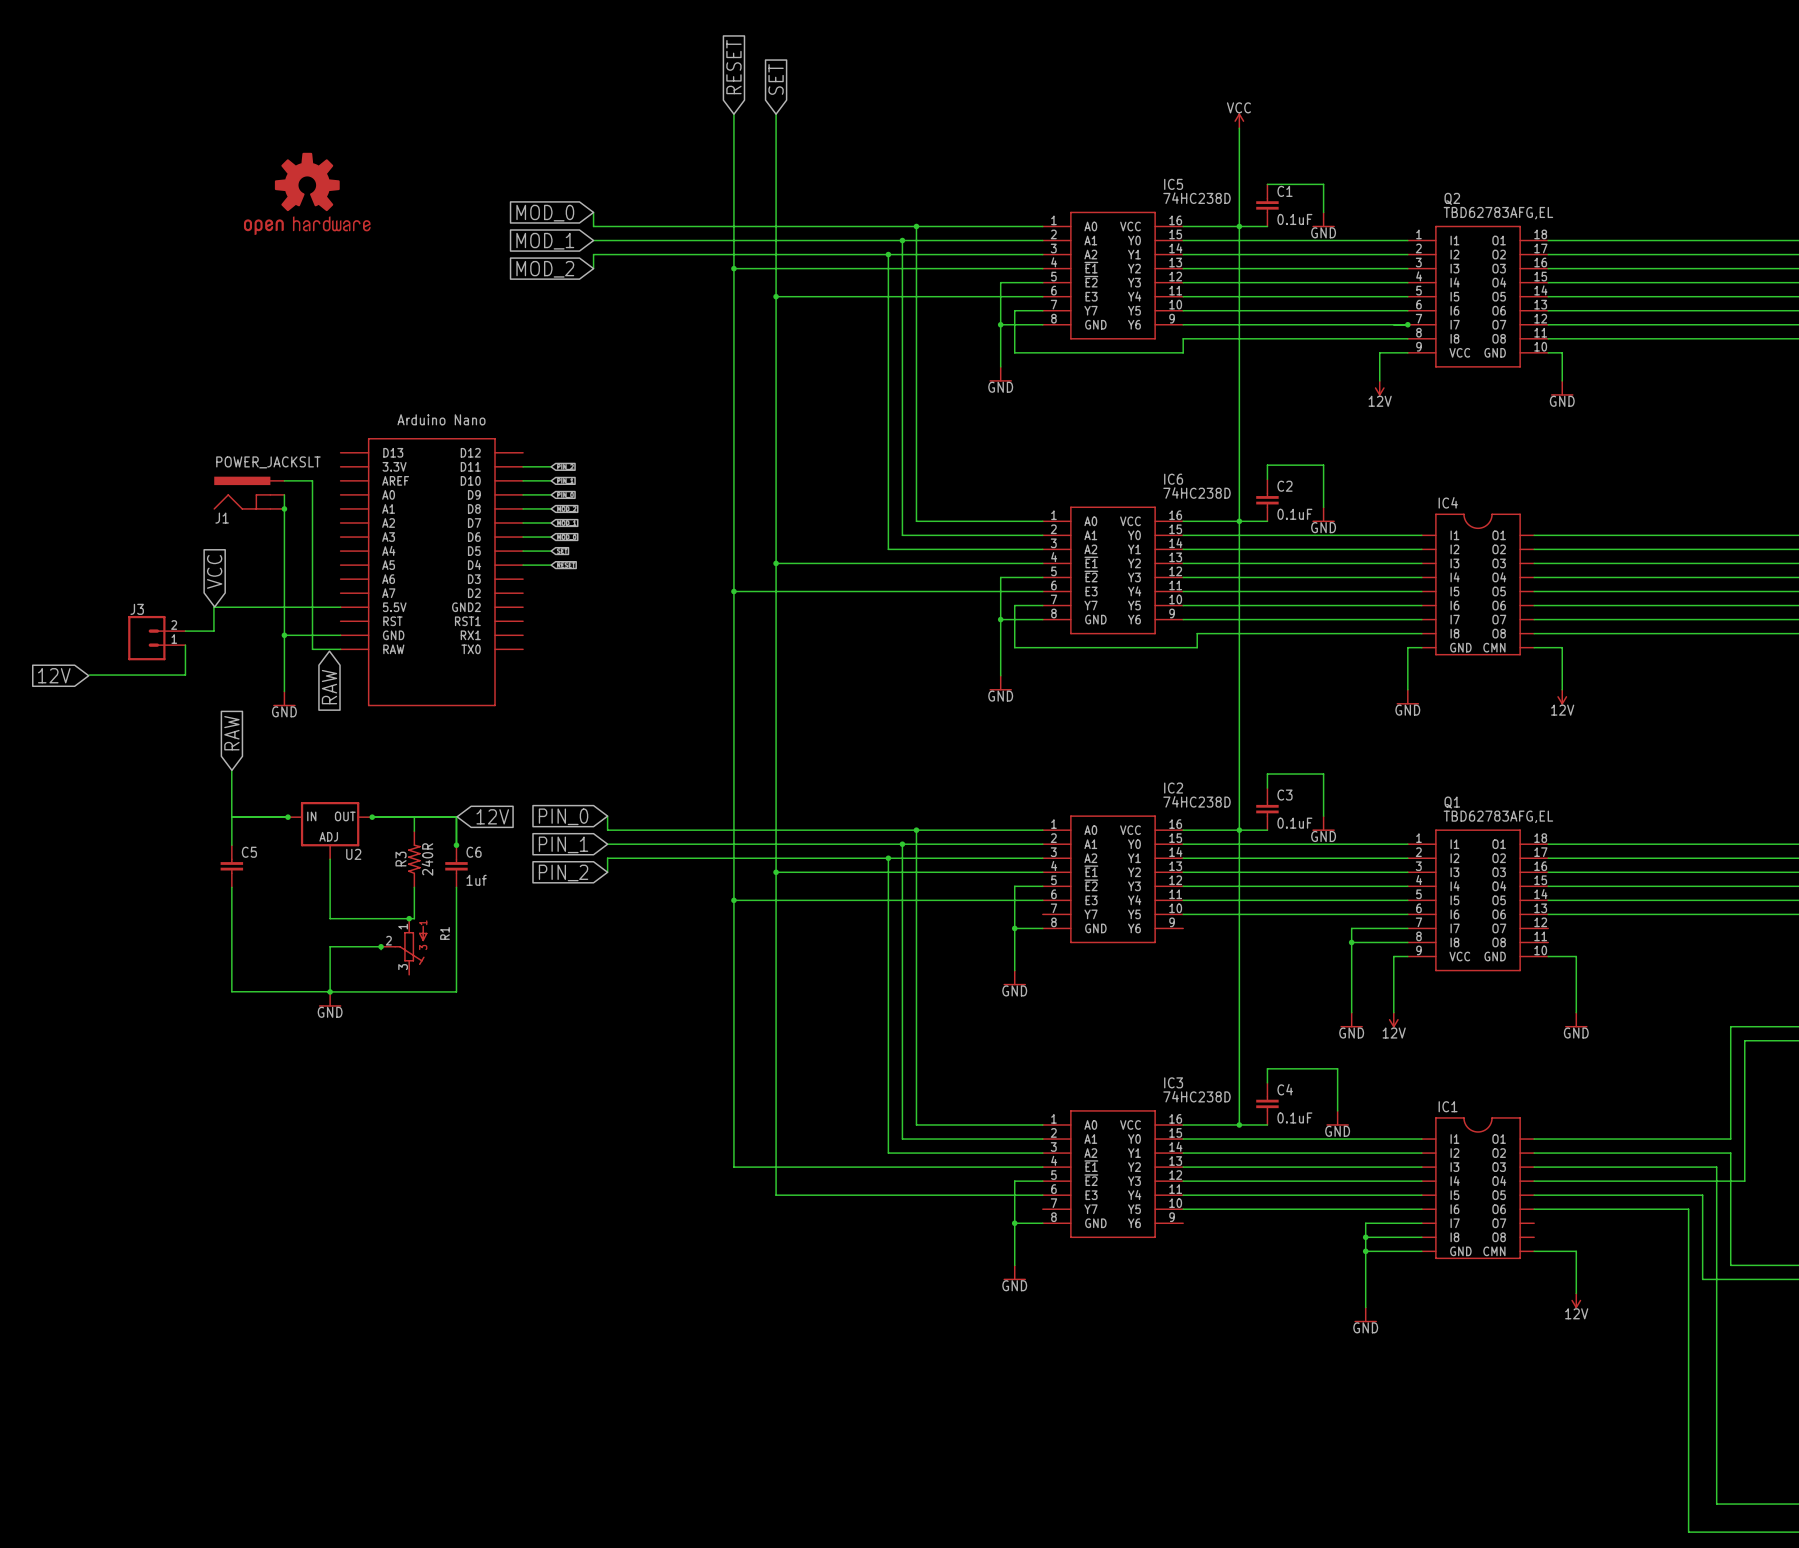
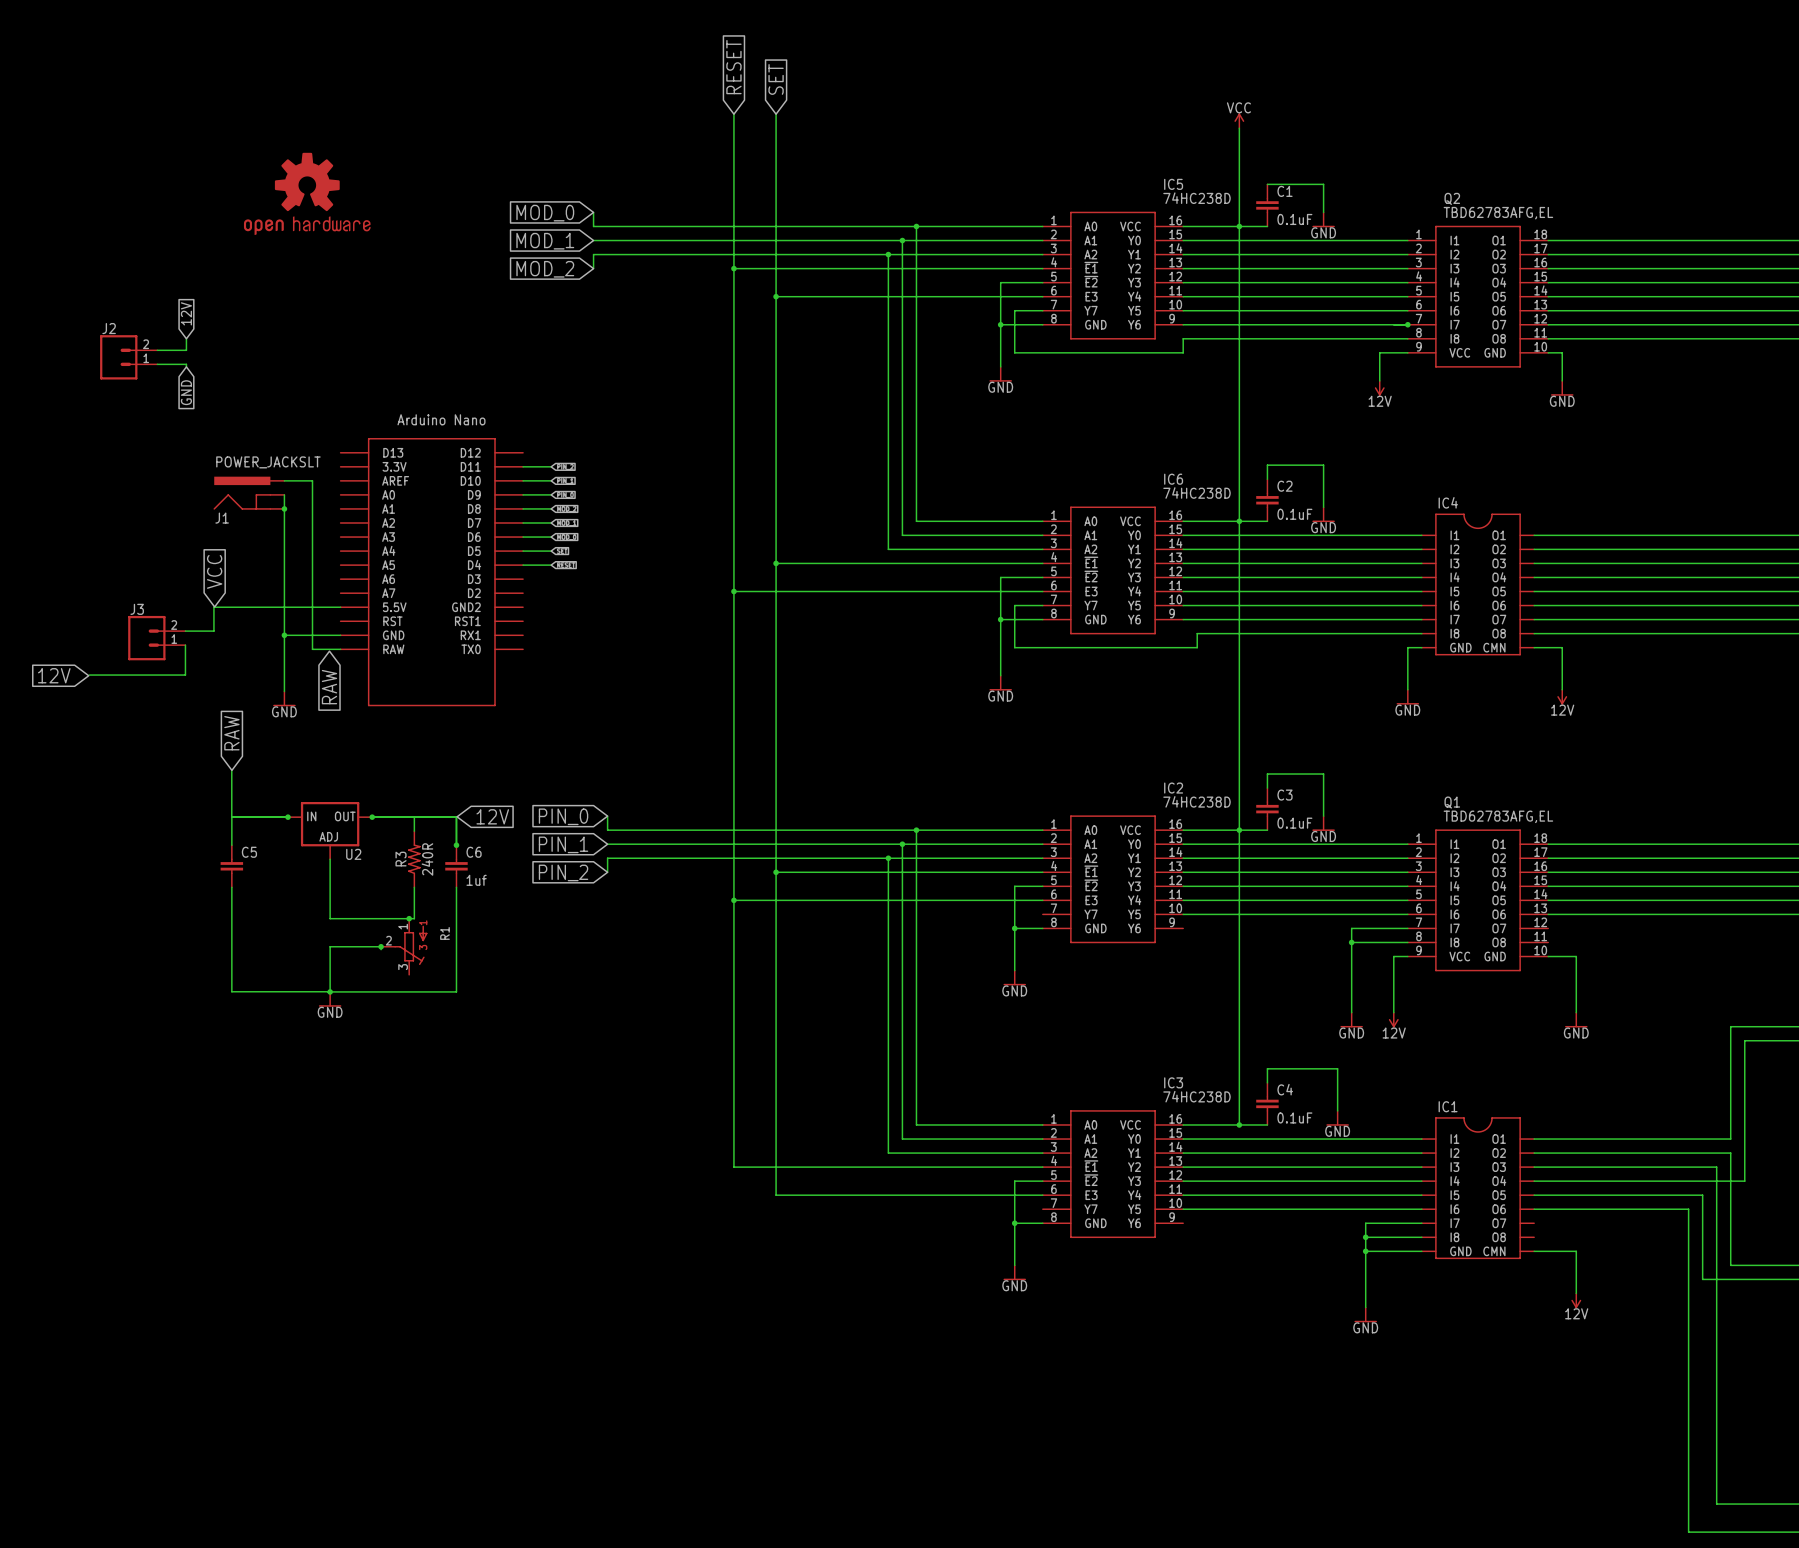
global label: none -> 12V (186, 313)
wire: none -> (186, 338) (186, 350) (157, 350)
J2: none -> (128, 357)
wire: none -> (157, 364) (186, 364) (186, 366)
global label: none -> GND (186, 392)

